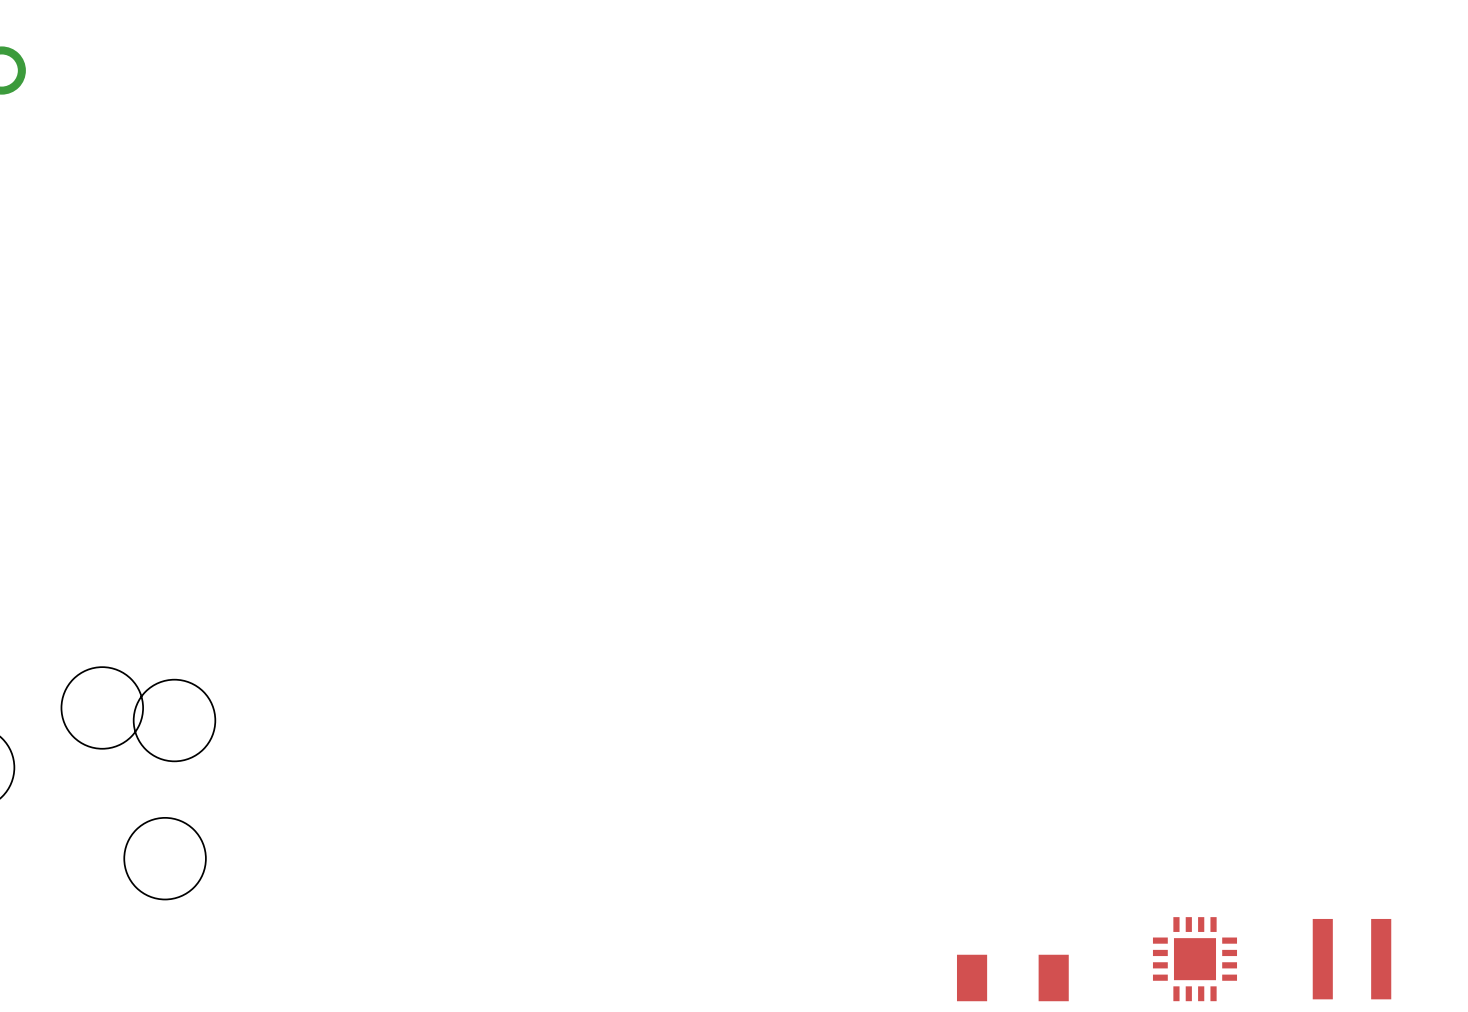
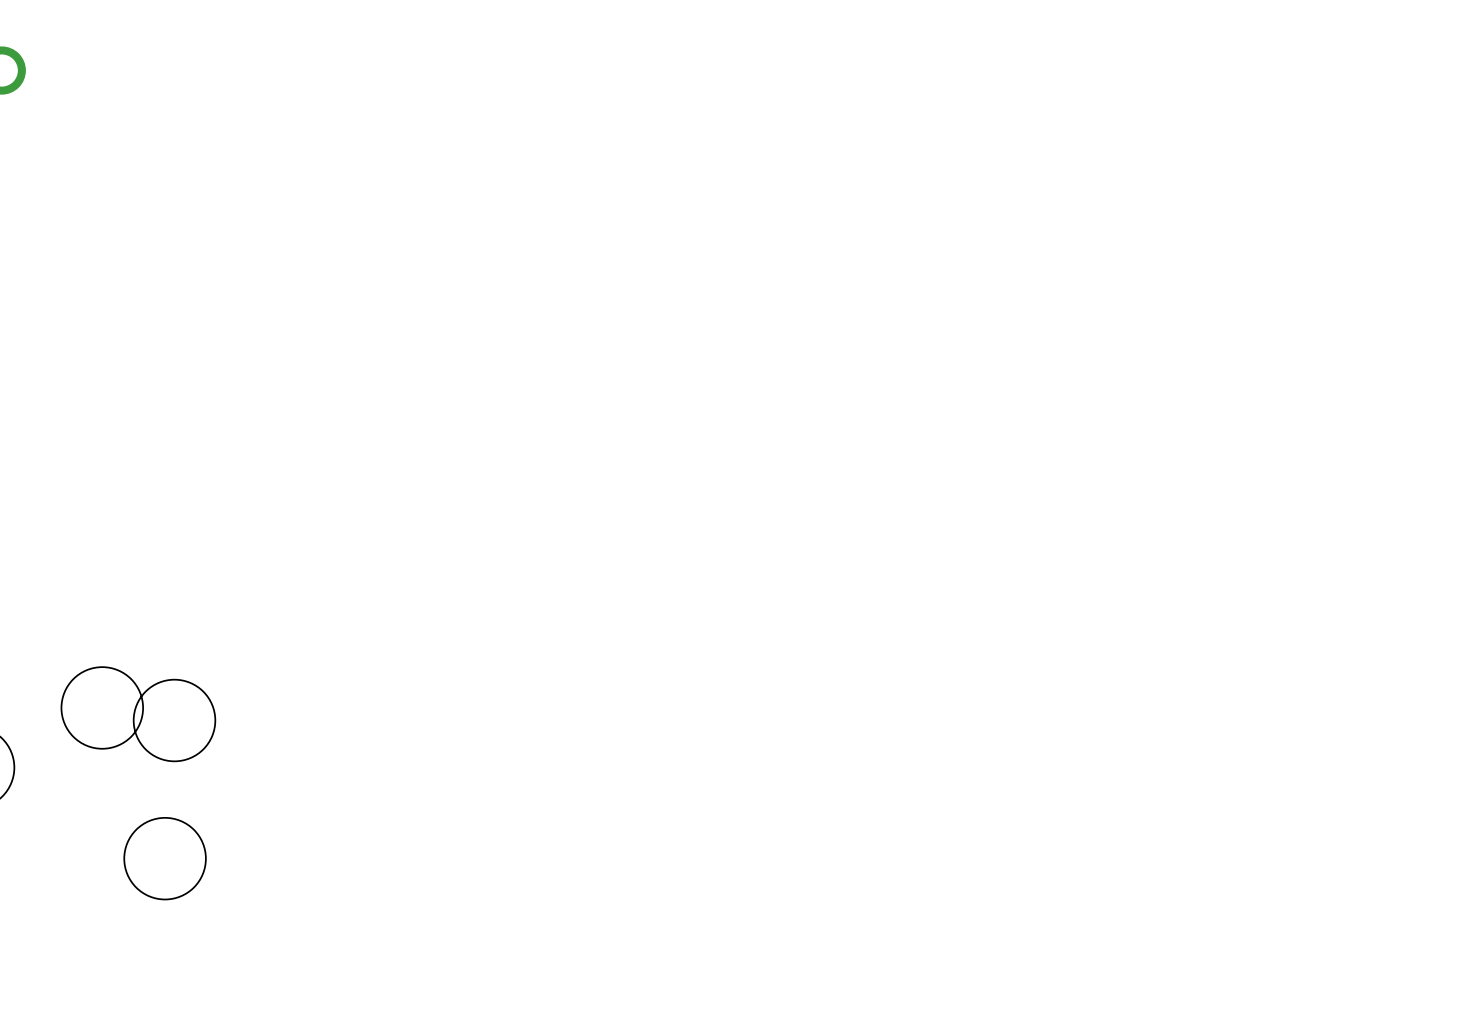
part: (1194, 959) -> none
part: (1351, 959) -> none
part: (1012, 977) -> none

